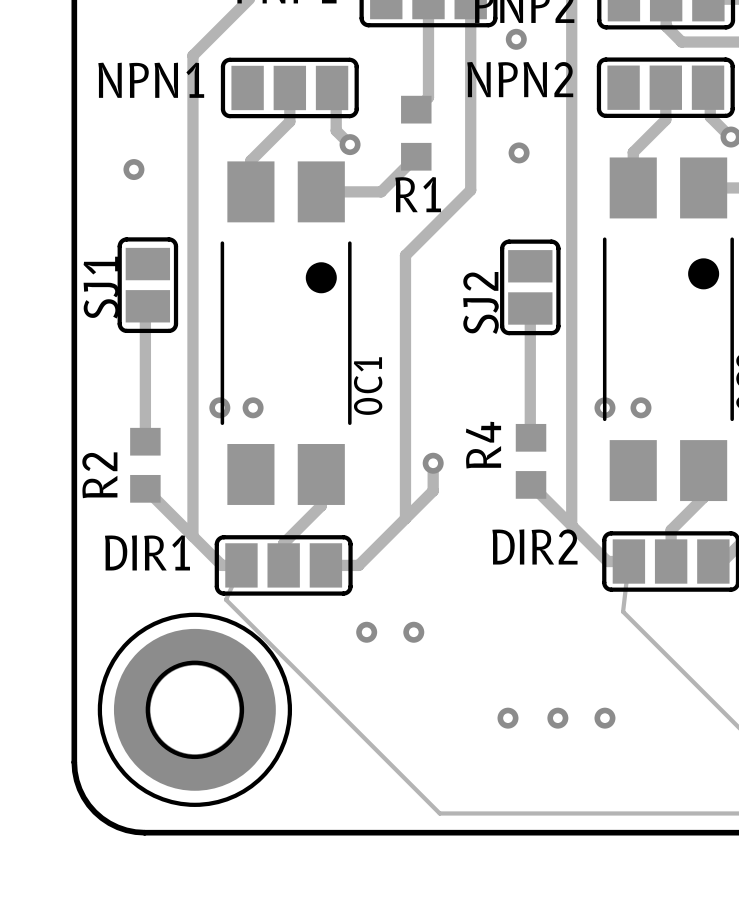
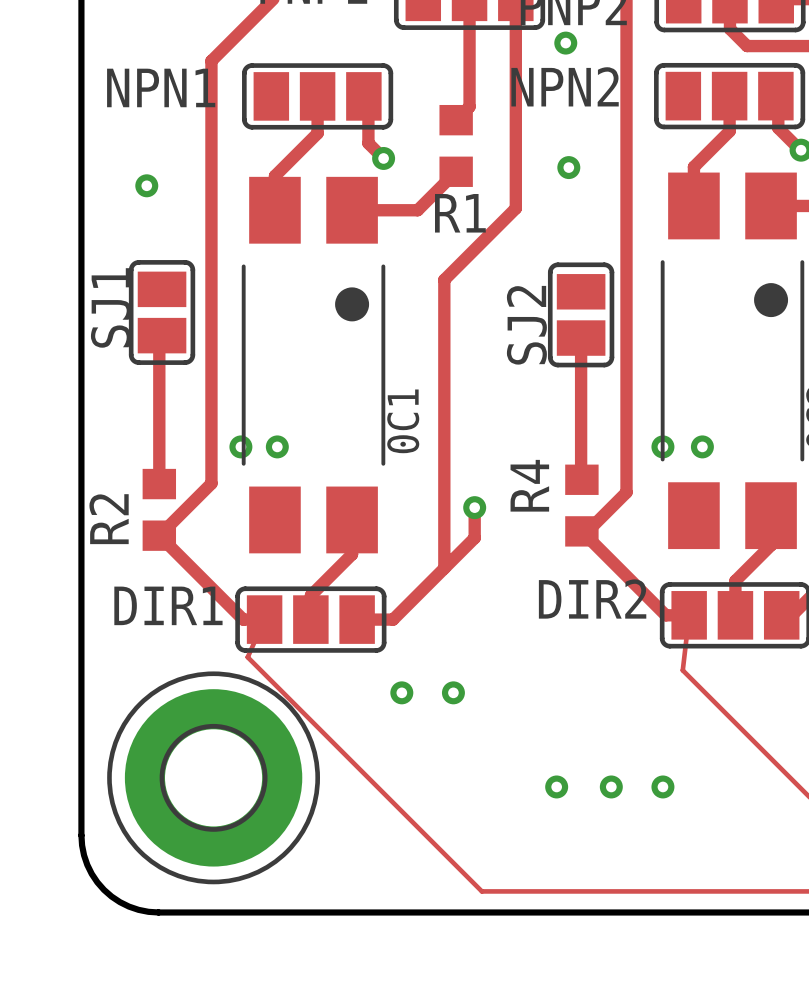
track: (192, 441) (192, 536) -> (211, 483) (159, 535)
track: (571, 449) (571, 525) -> (626, 492) (587, 531)

